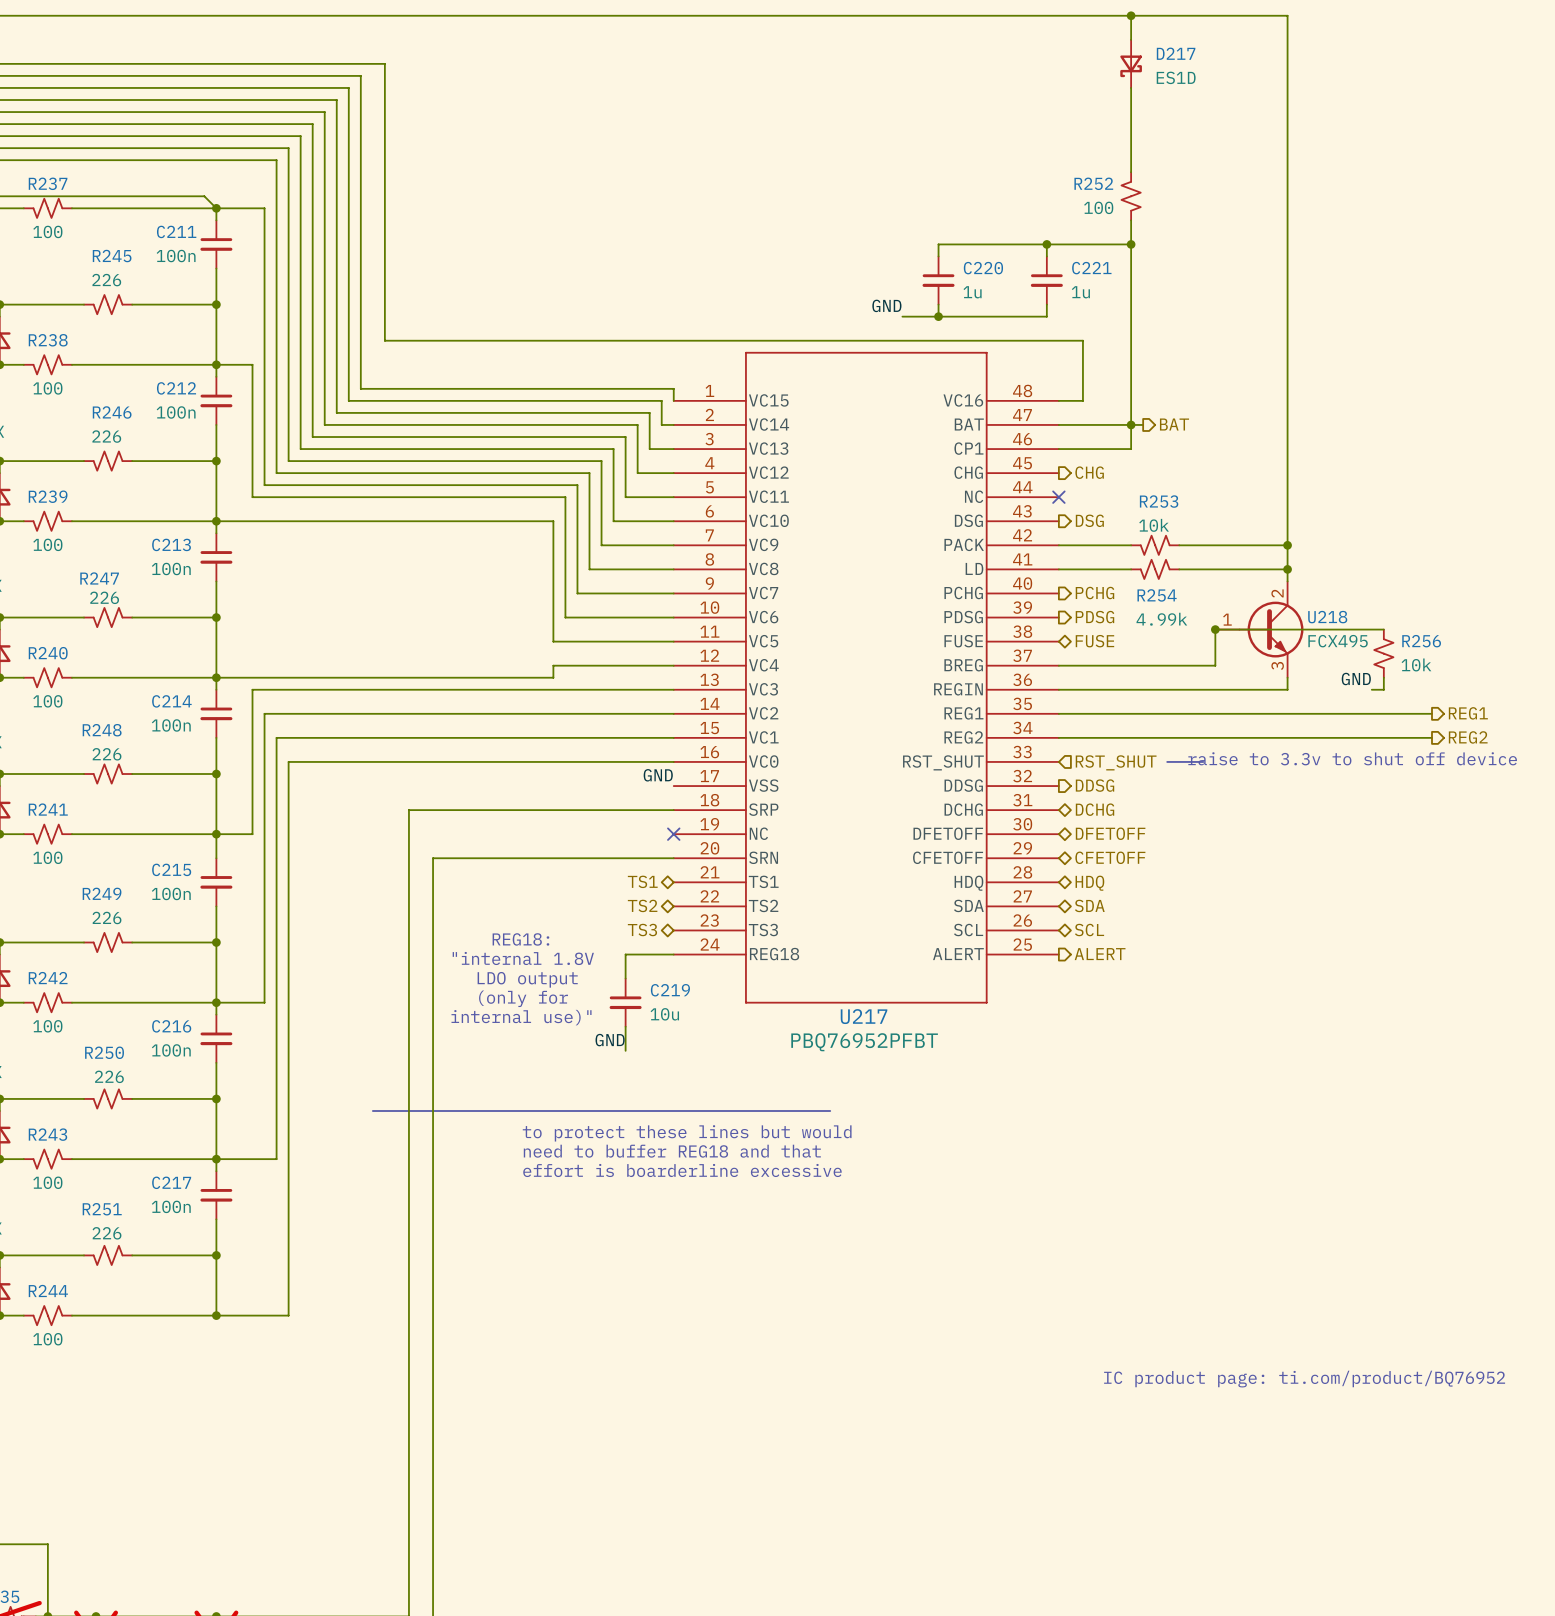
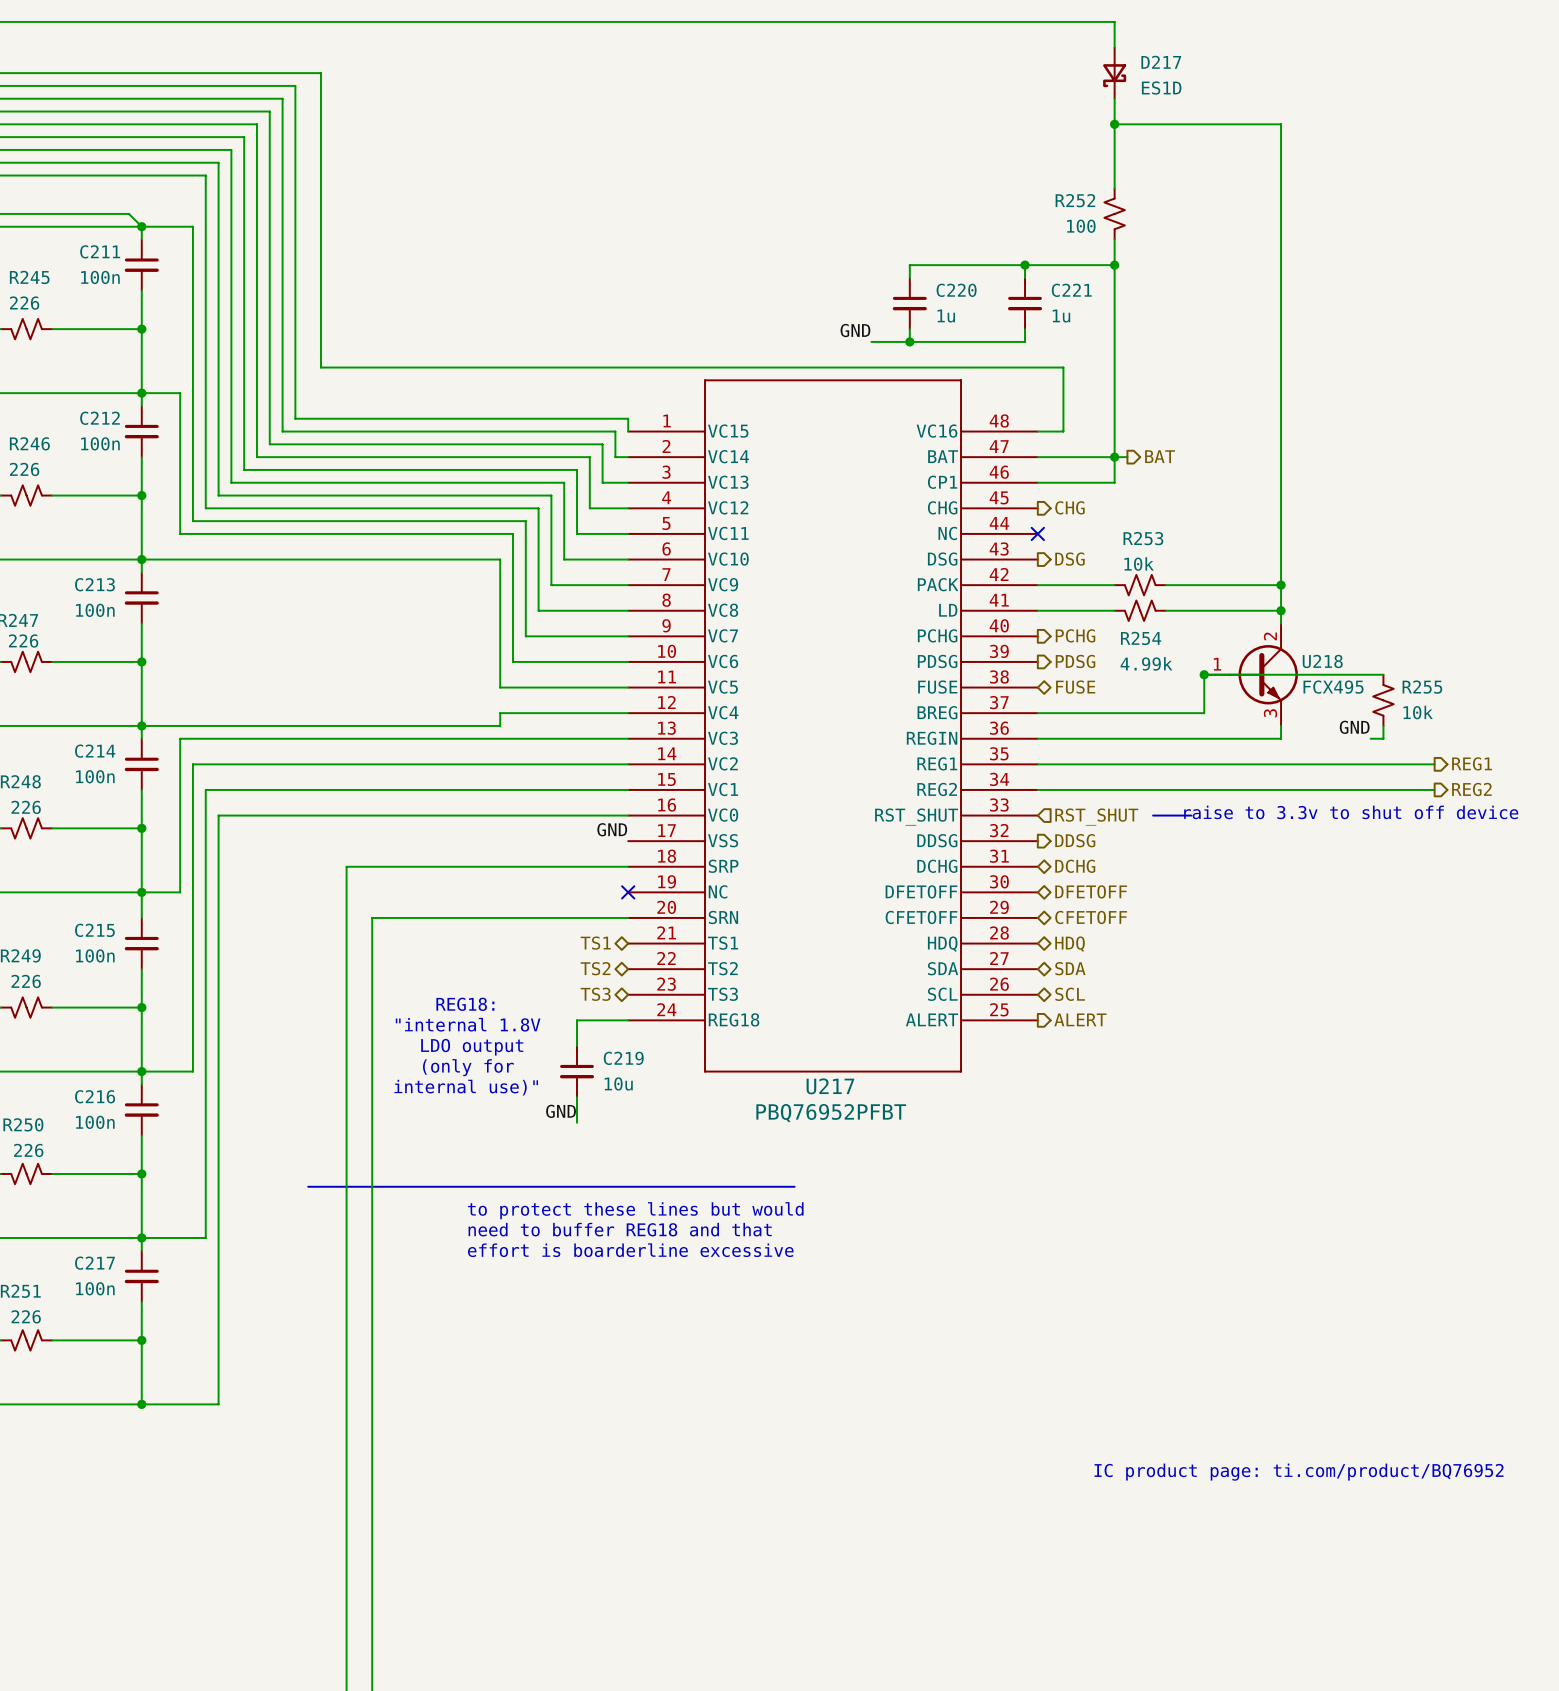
wire: (1131, 15) (1287, 15) (1287, 112) -> (1114, 124) (1281, 124)
junction: (1131, 15) -> none
junction: none -> (1114, 124)
R256 name: R256 (1421, 641) -> R255 (1422, 687)

